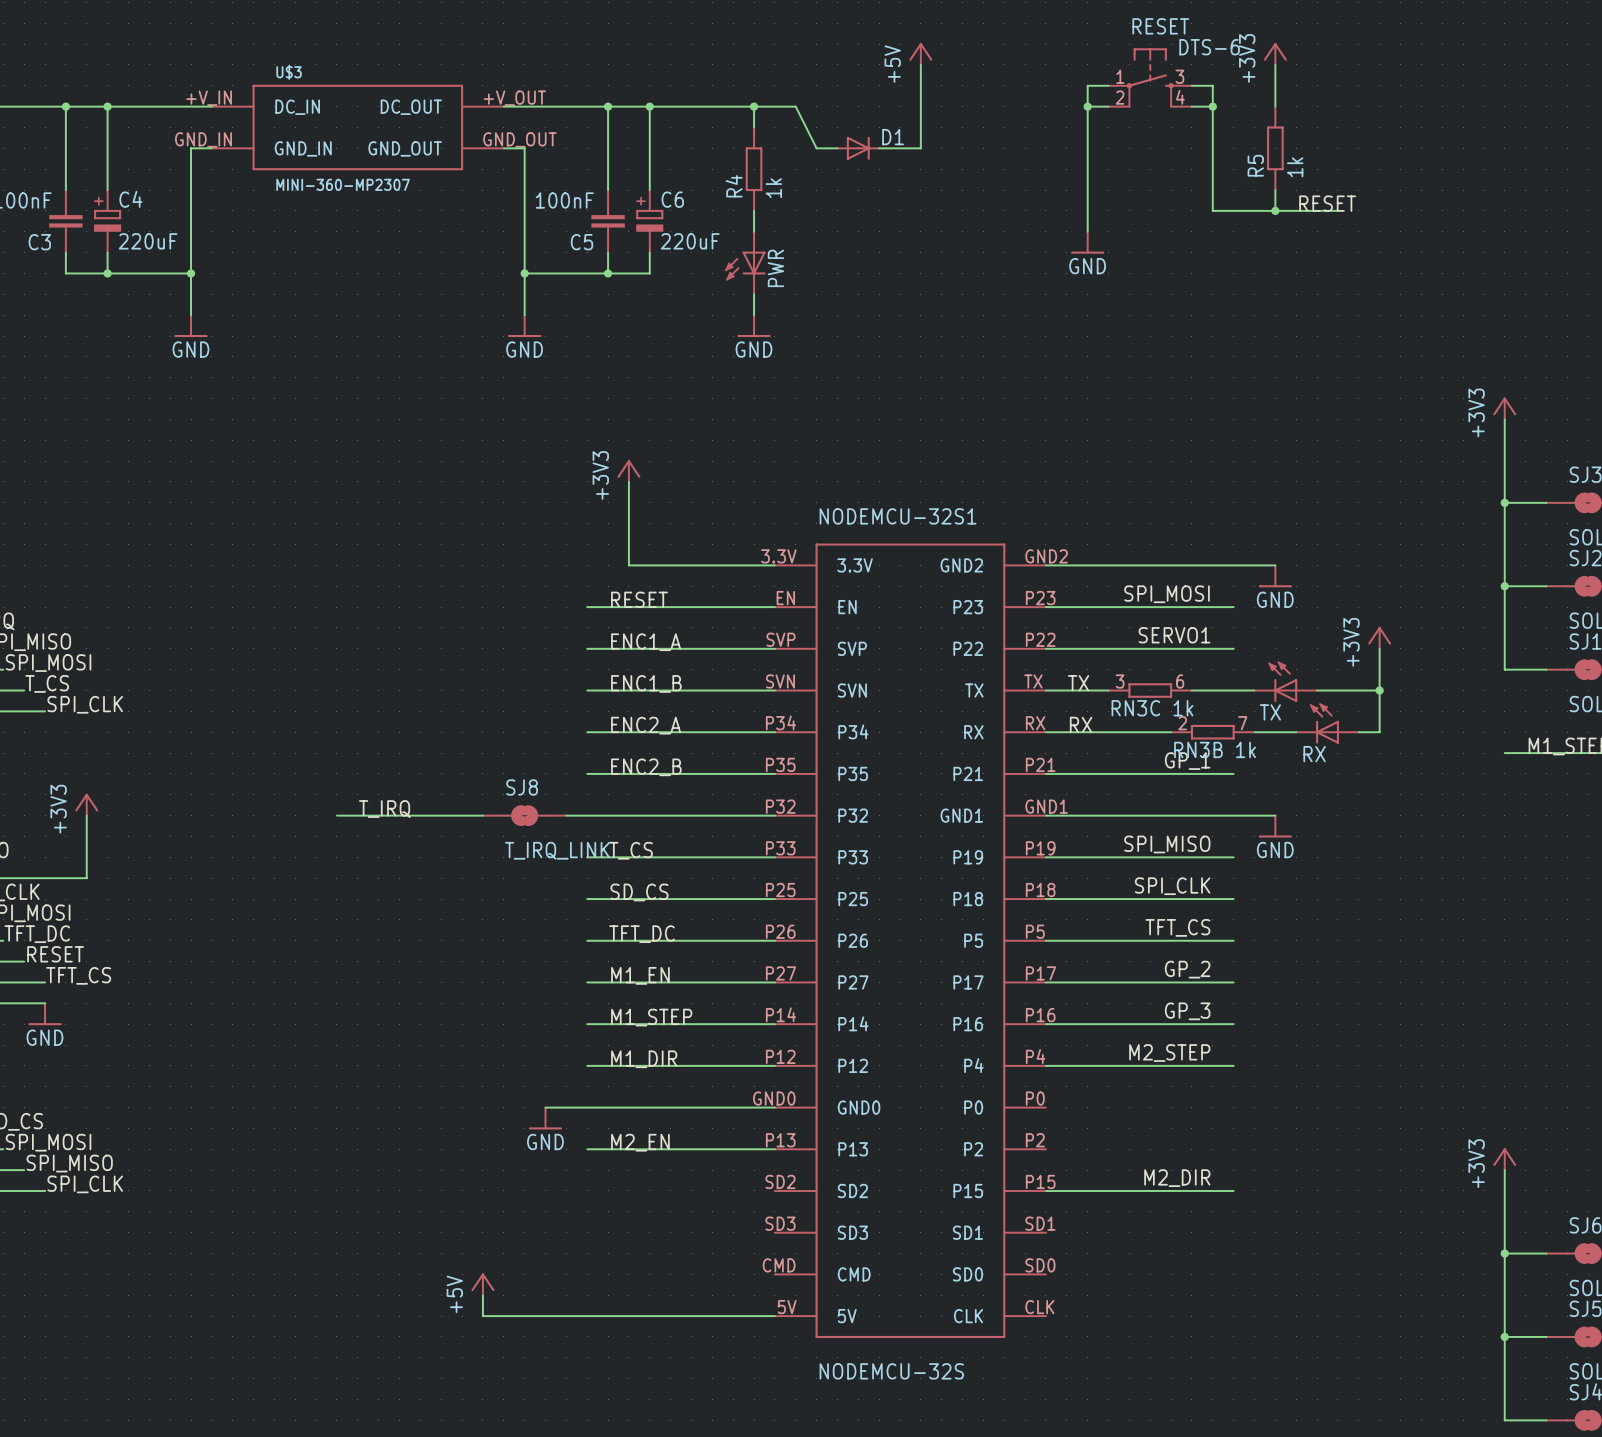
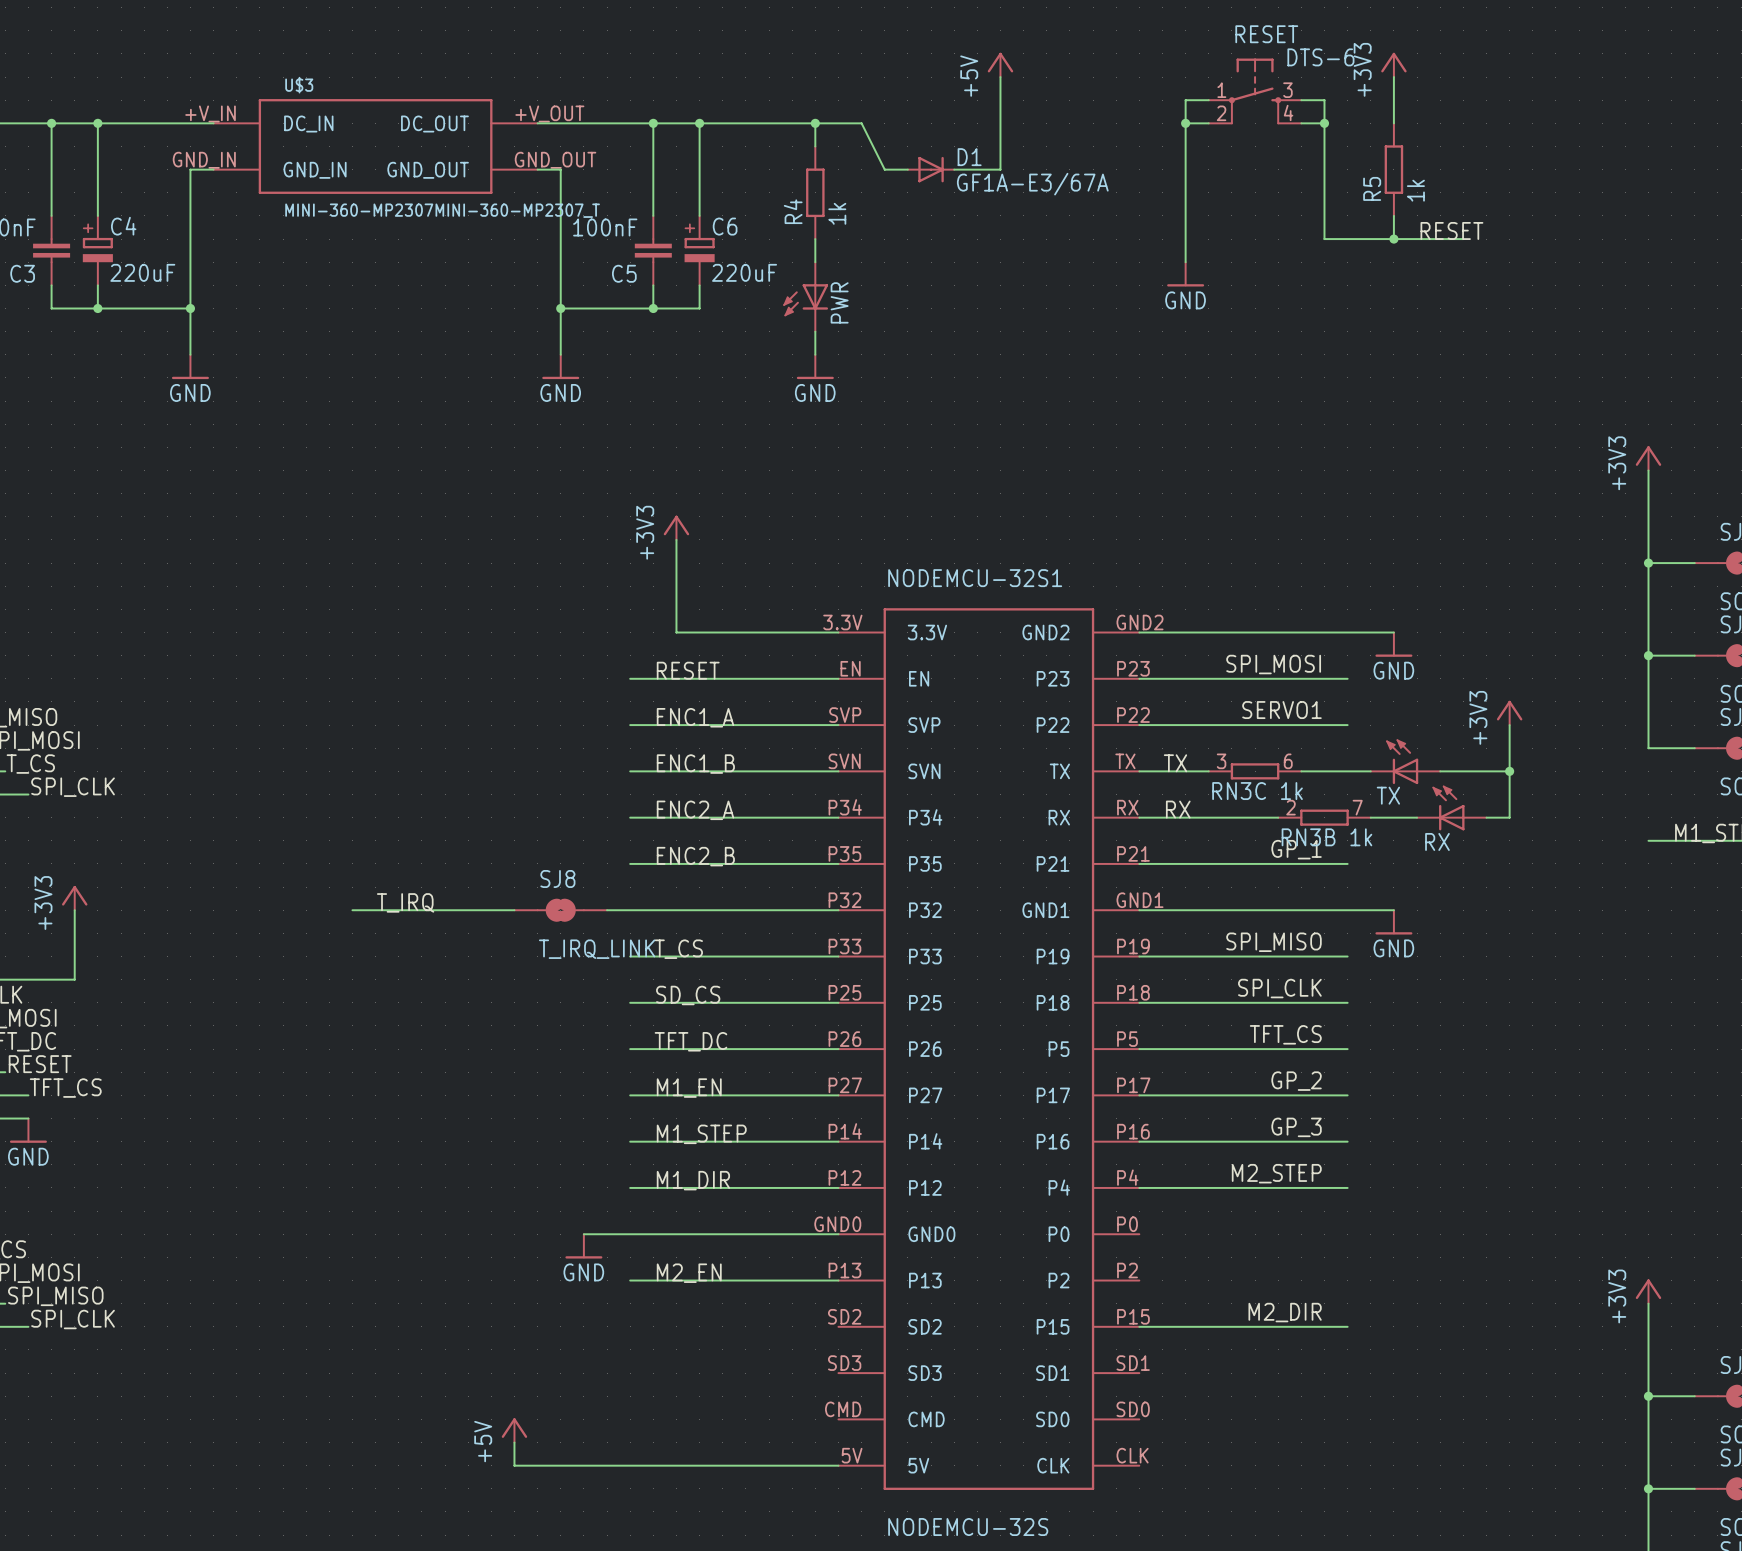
D1 value: none -> GF1A-E3/67A (1032, 184)
U$3 value: MINI-360-MP2307 (343, 184) -> MINI-360-MP2307MINI-360-MP2307_T (442, 210)

